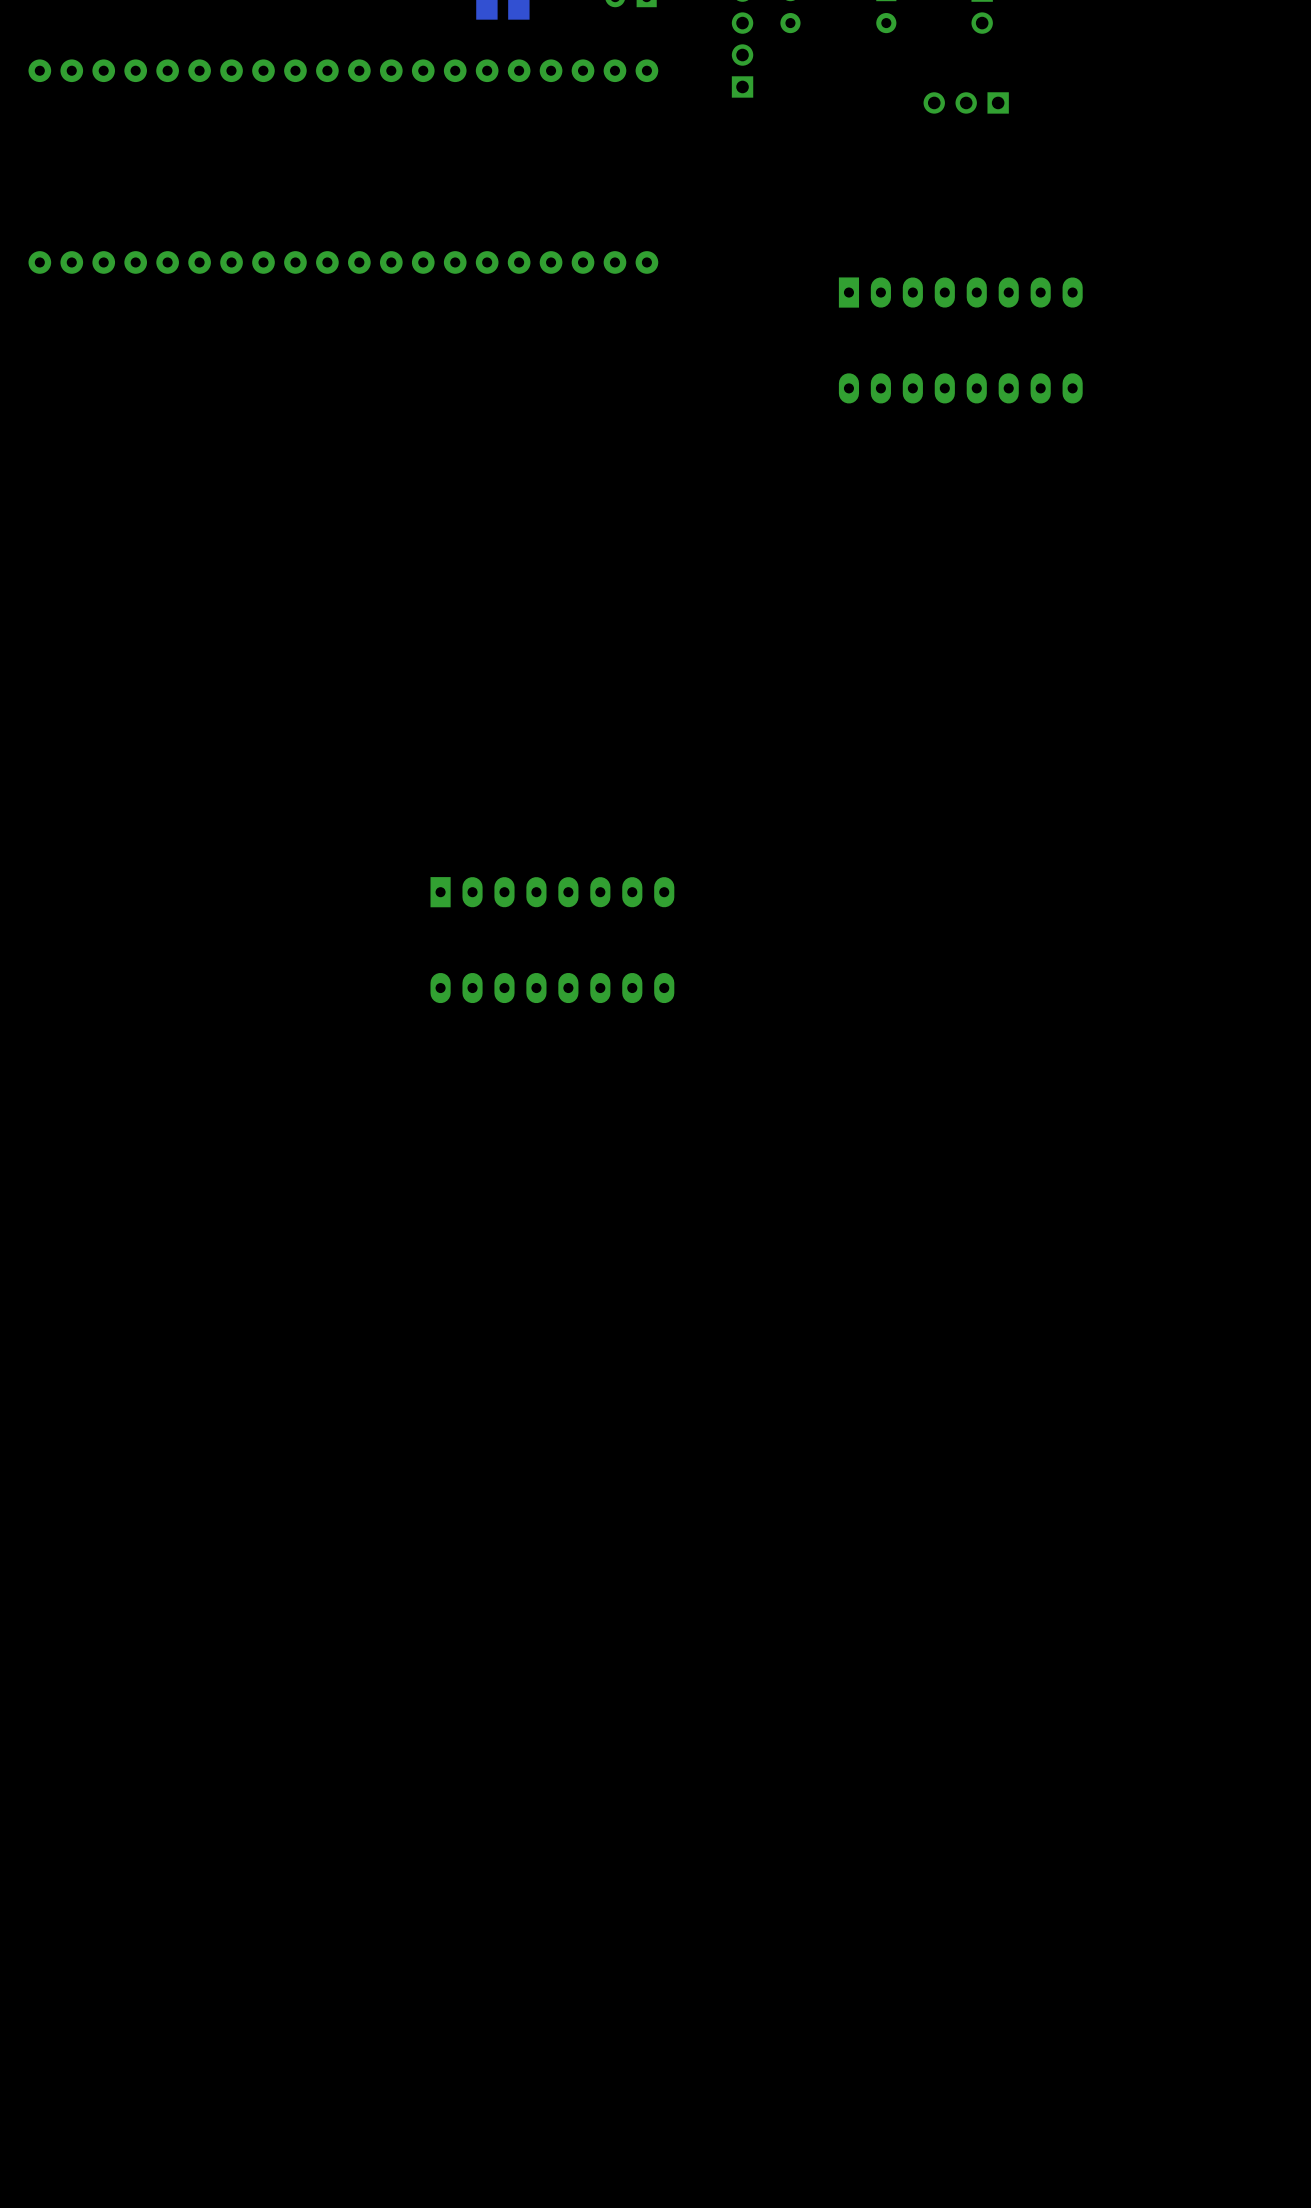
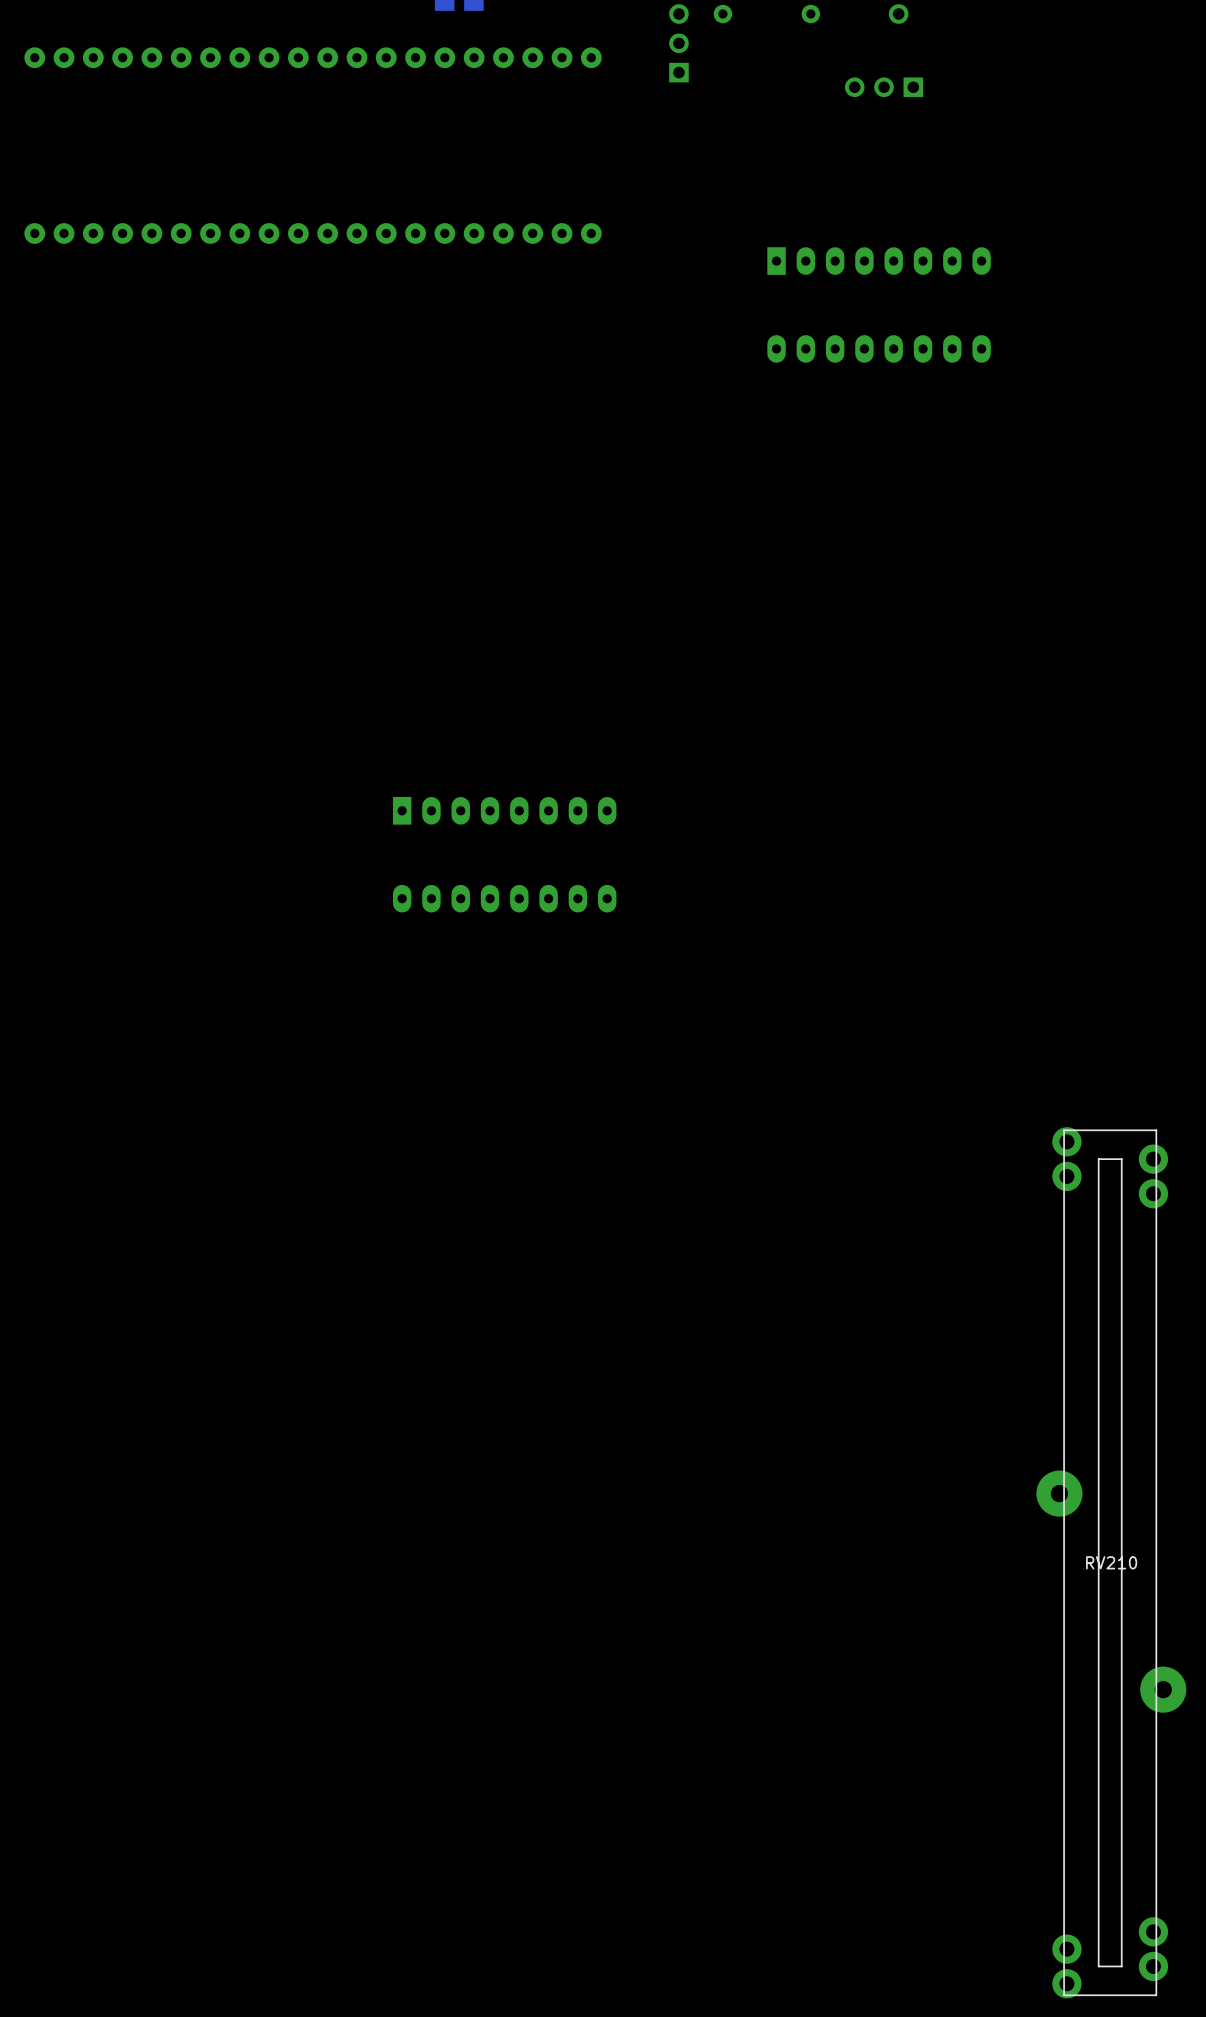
RV210: none -> (1111, 1562)

